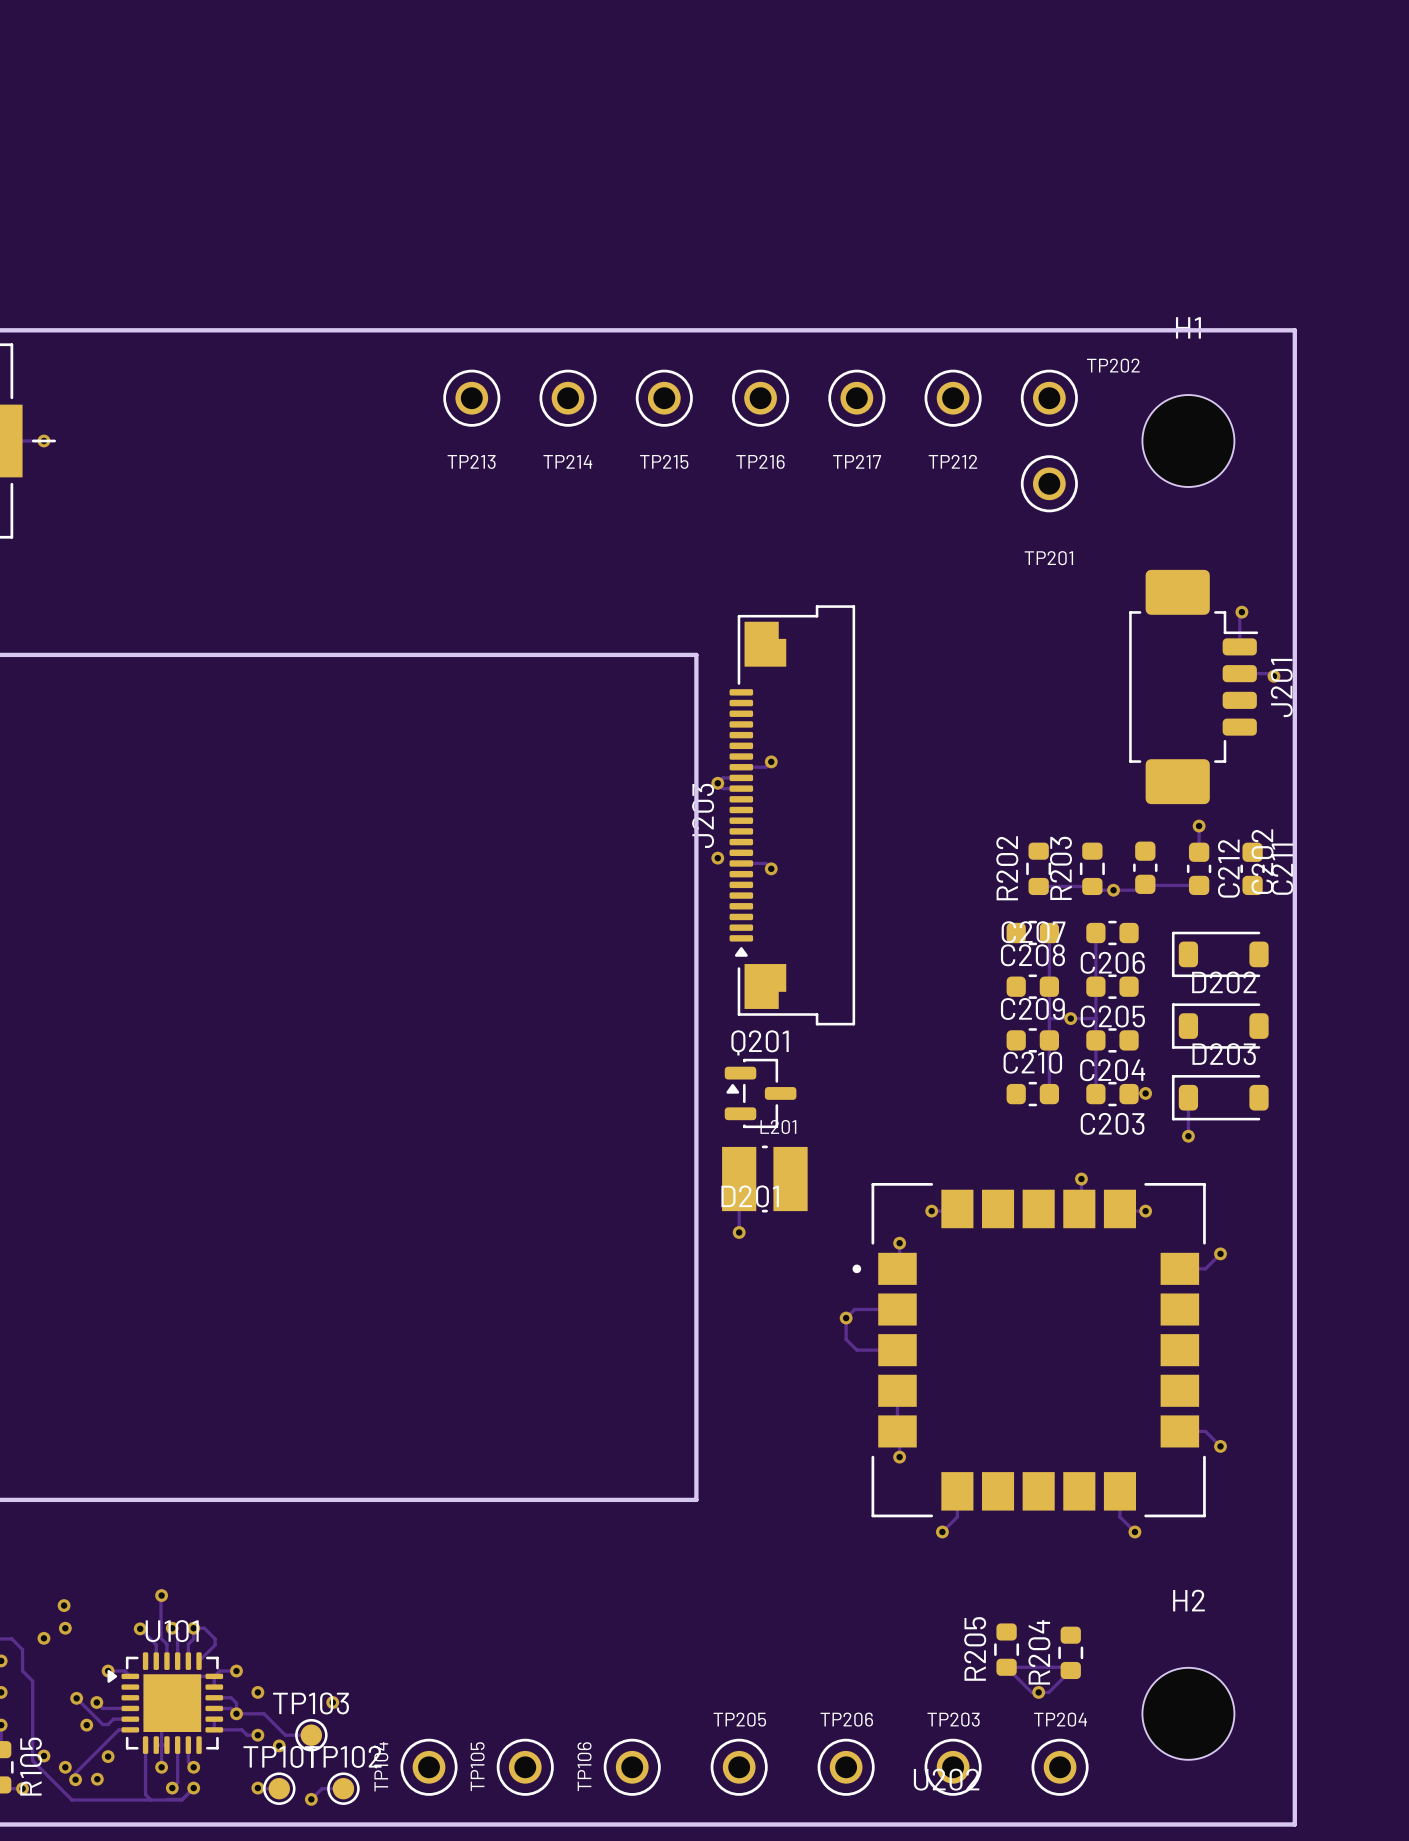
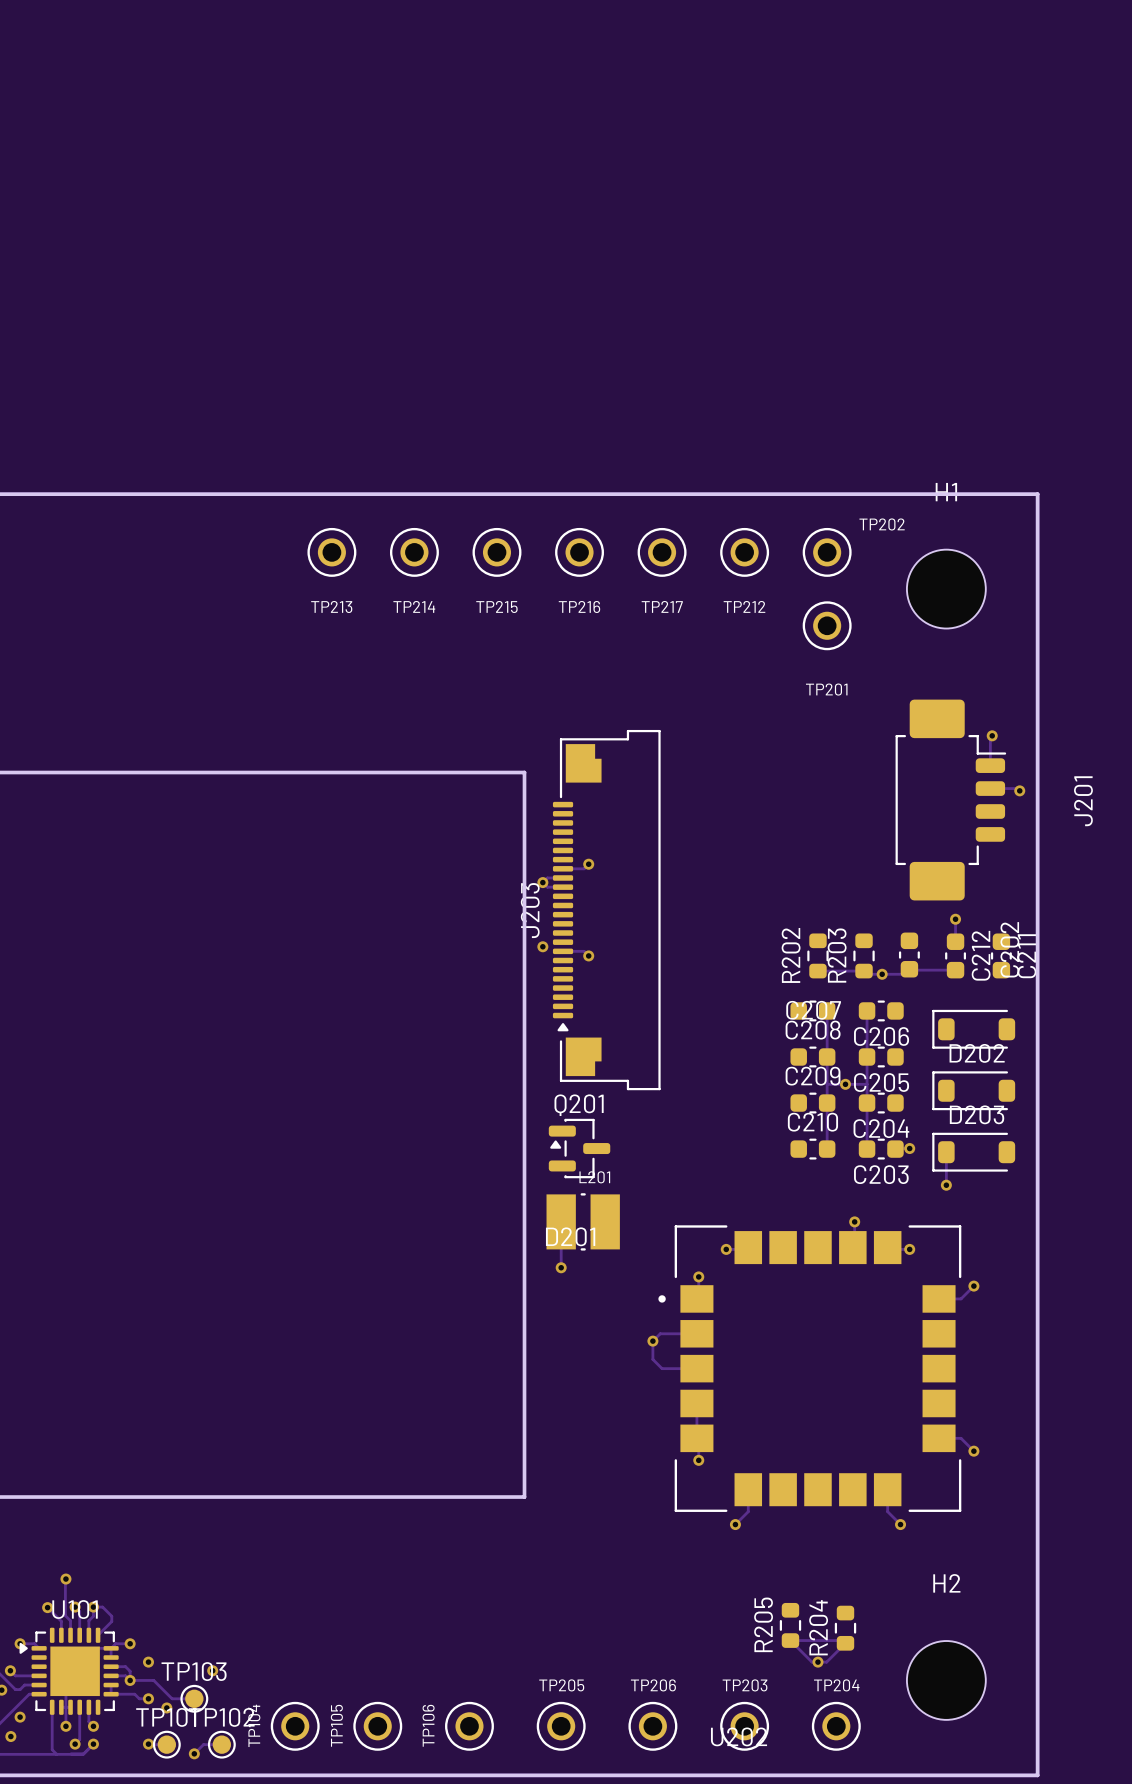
J201 name position: J201 (1281, 687) -> J201 (1083, 801)

